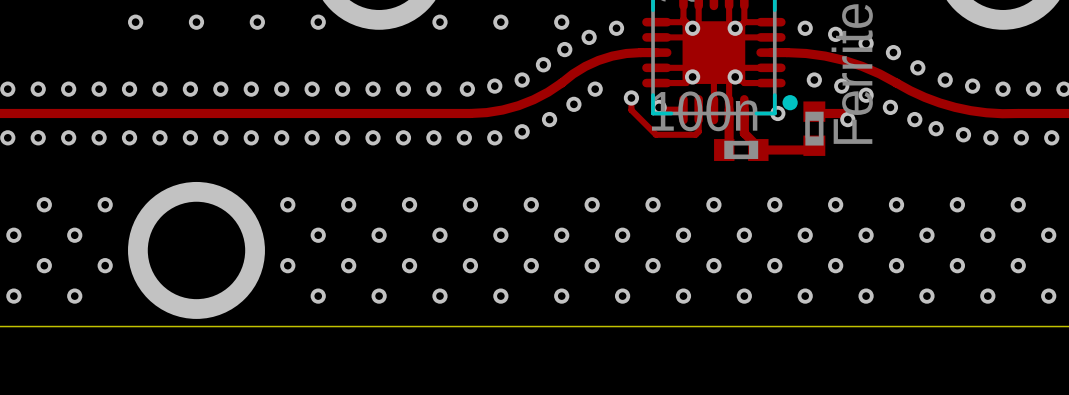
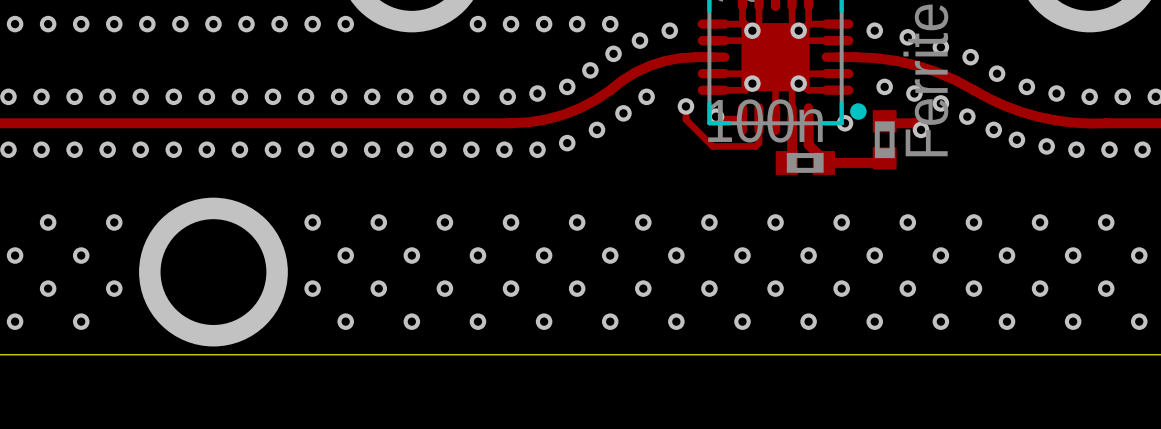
via: none -> (15, 24)
via: none -> (48, 24)
via: none -> (81, 24)
via: none -> (114, 24)
via: none -> (180, 24)
via: none -> (246, 24)
via: none -> (312, 24)
via: none -> (511, 24)
via: none -> (577, 24)

